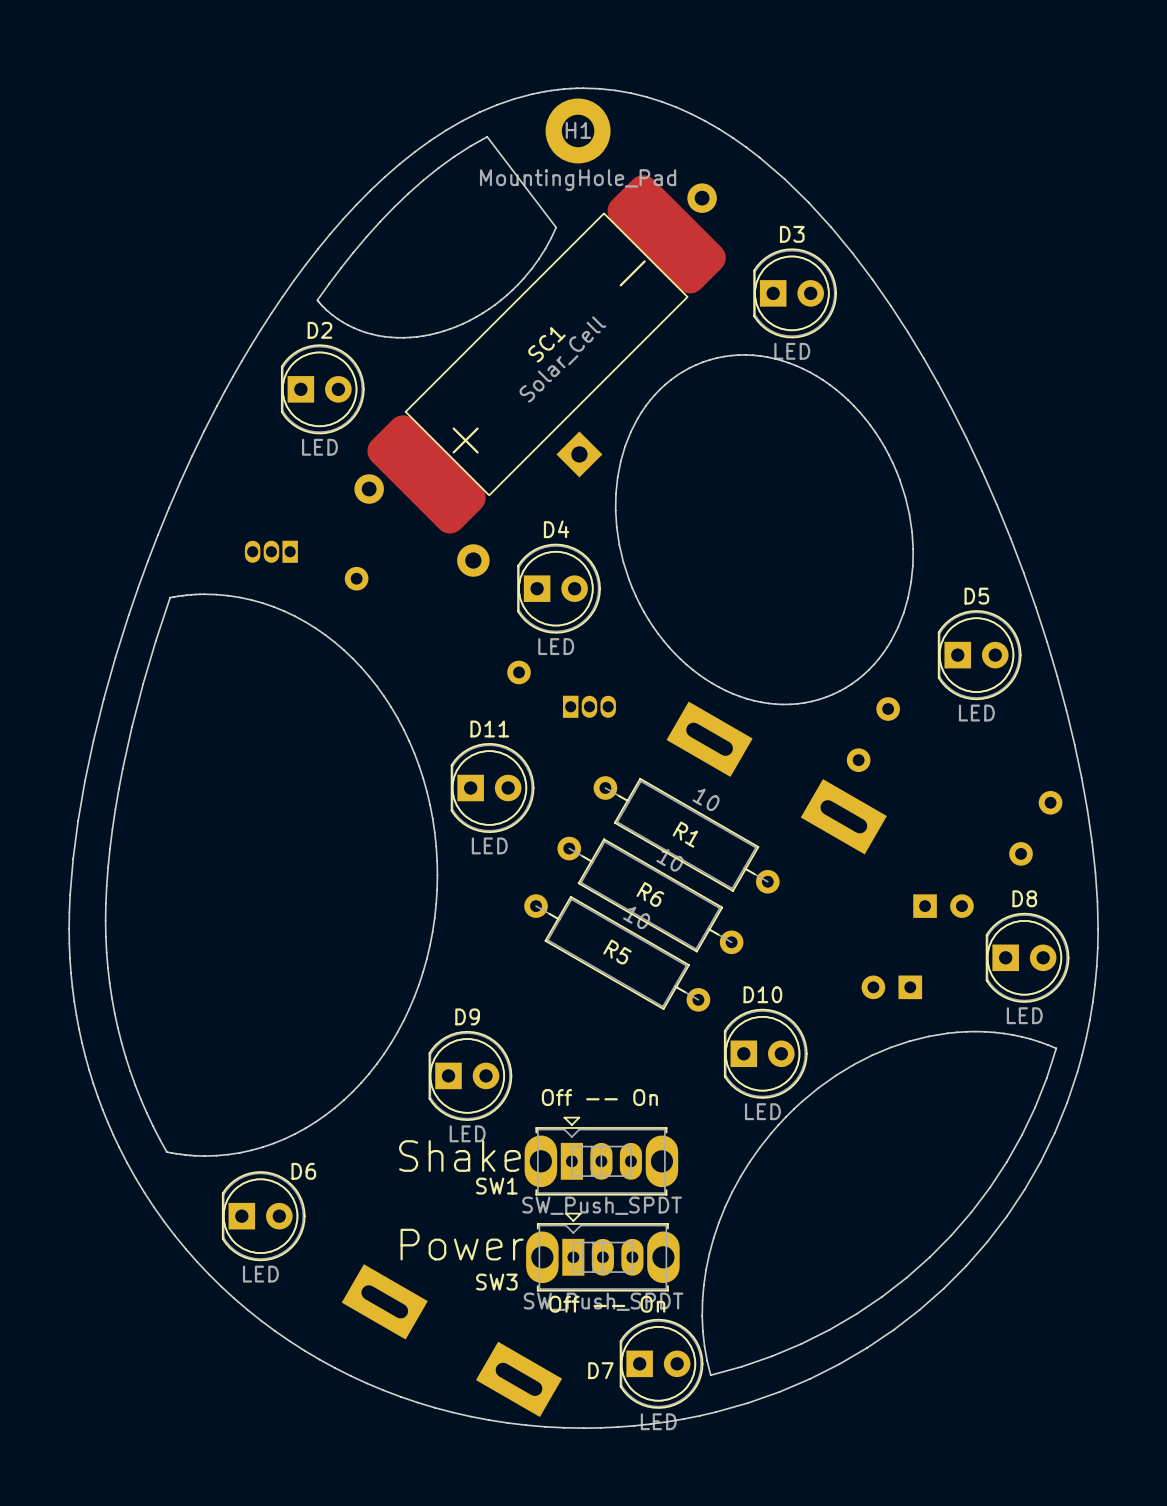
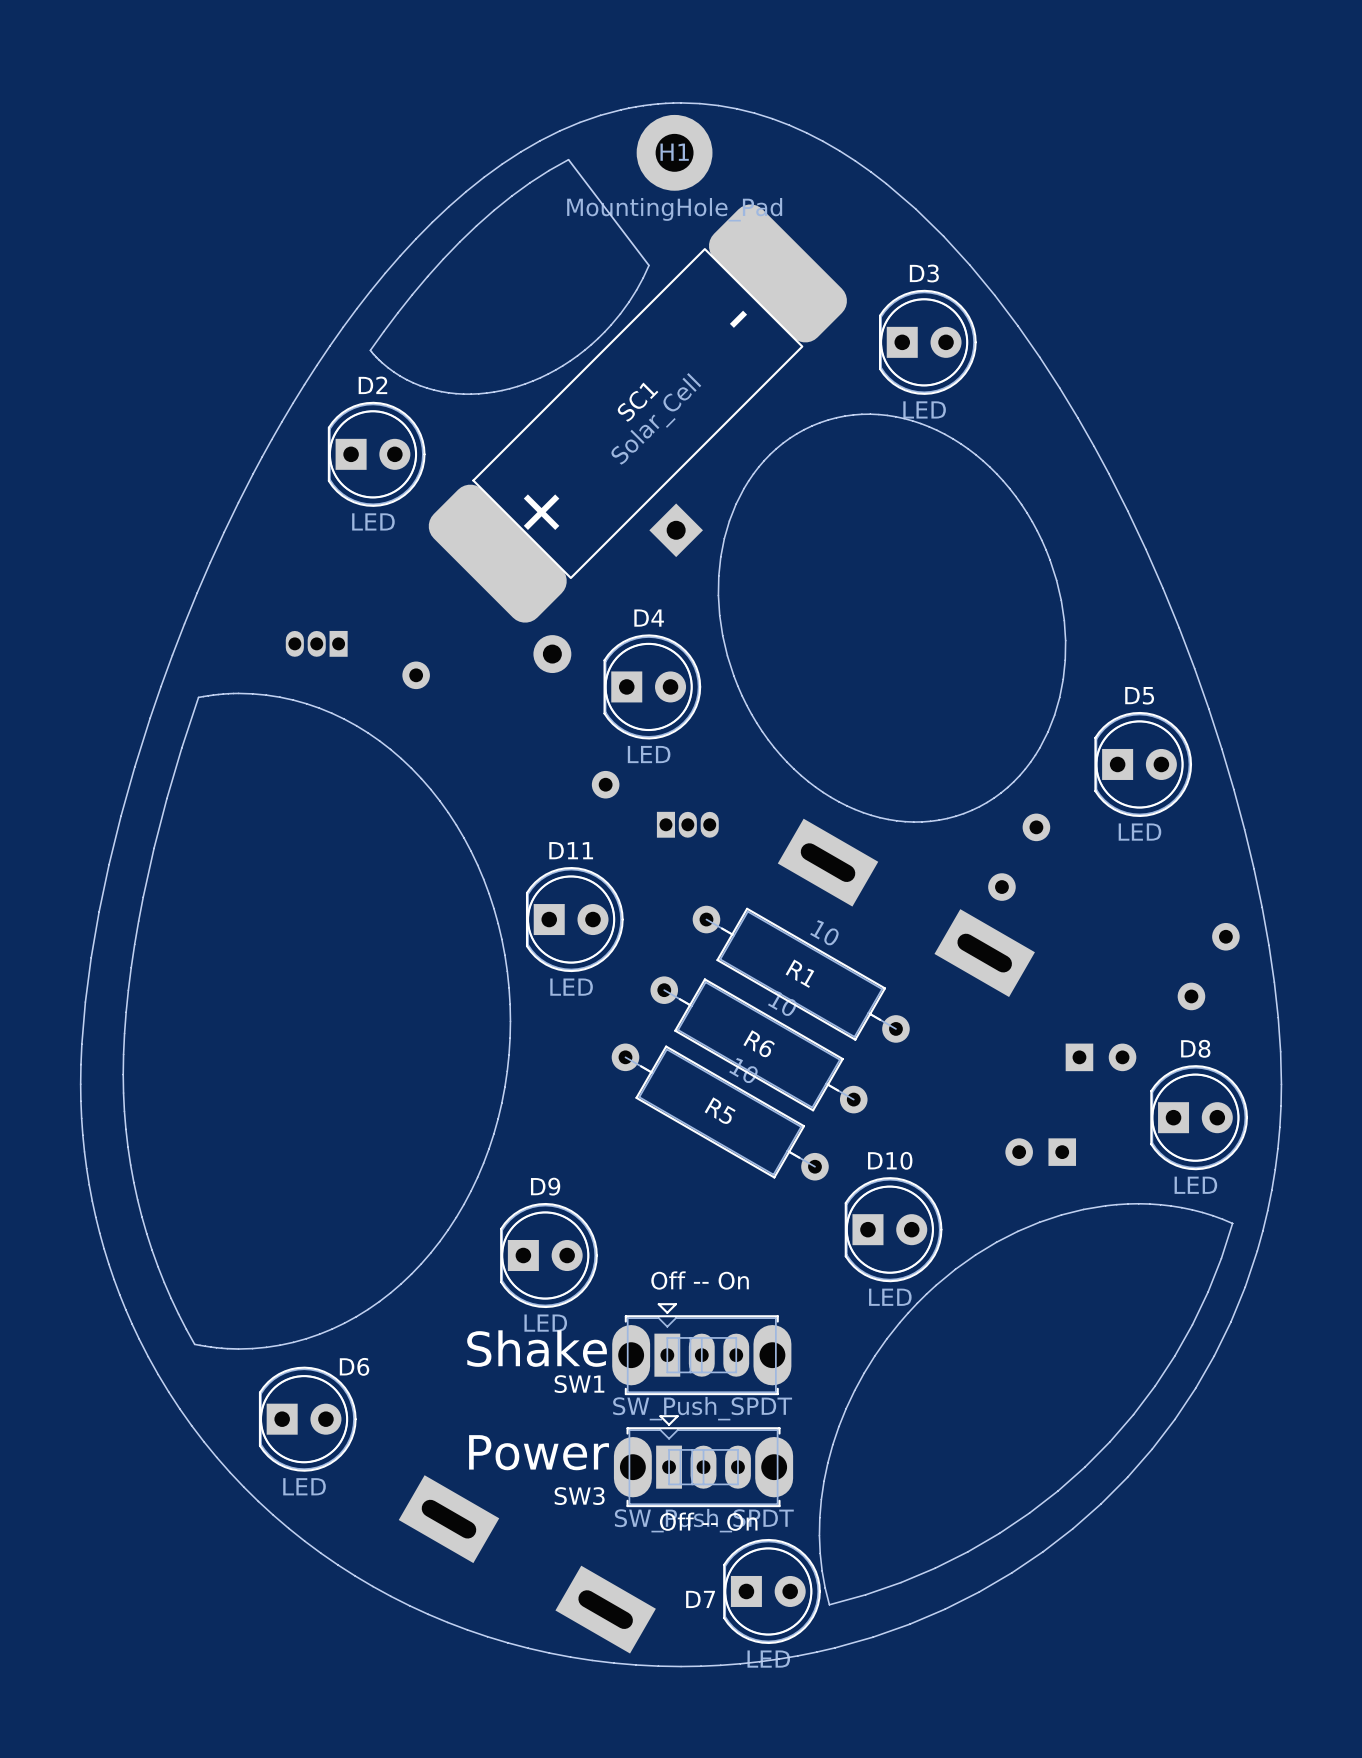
part: (702, 198) -> none
part: (369, 489) -> none

